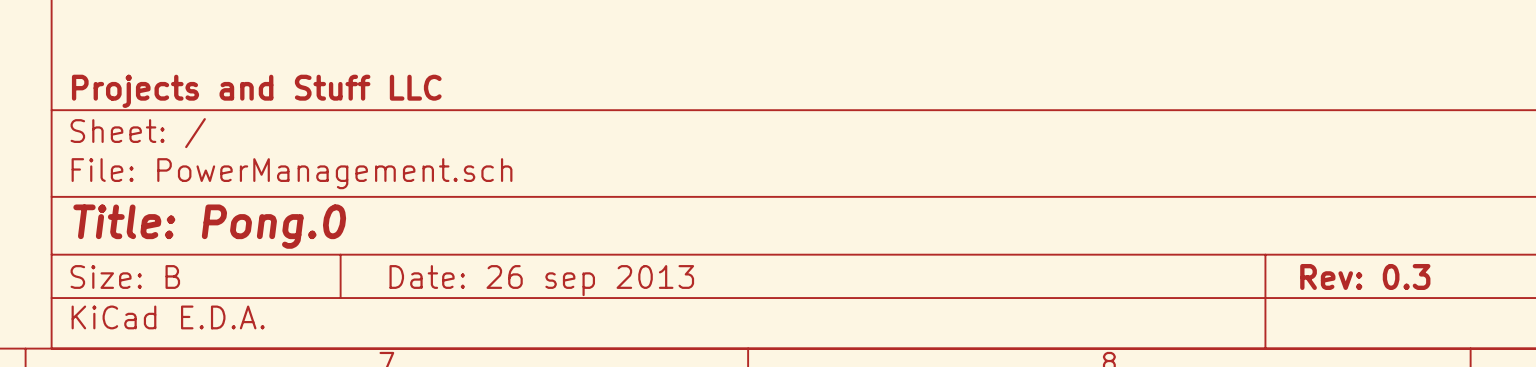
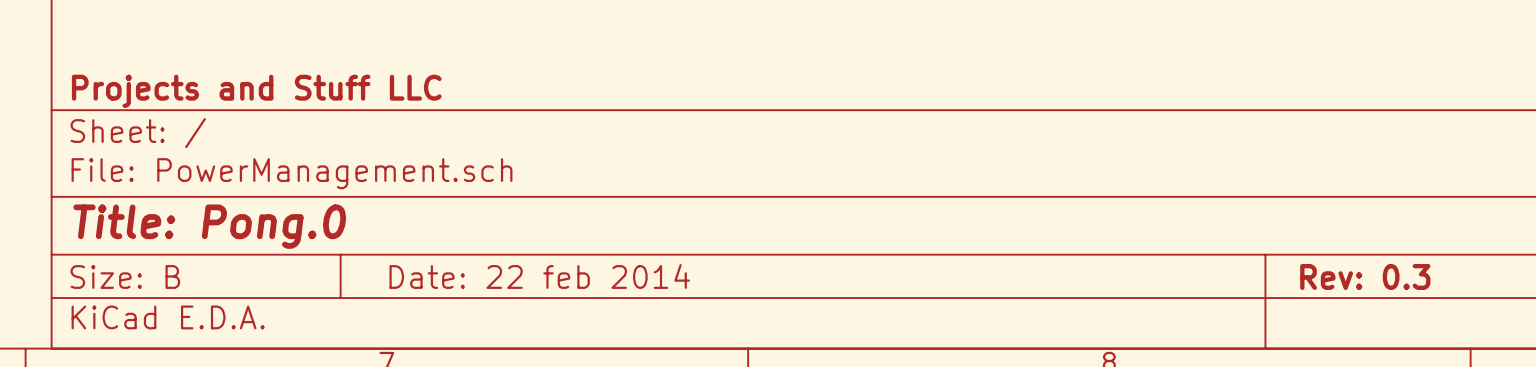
title block: Date: 26 sep 2013 (541, 280) -> Date: 22 feb 2014 (539, 276)

